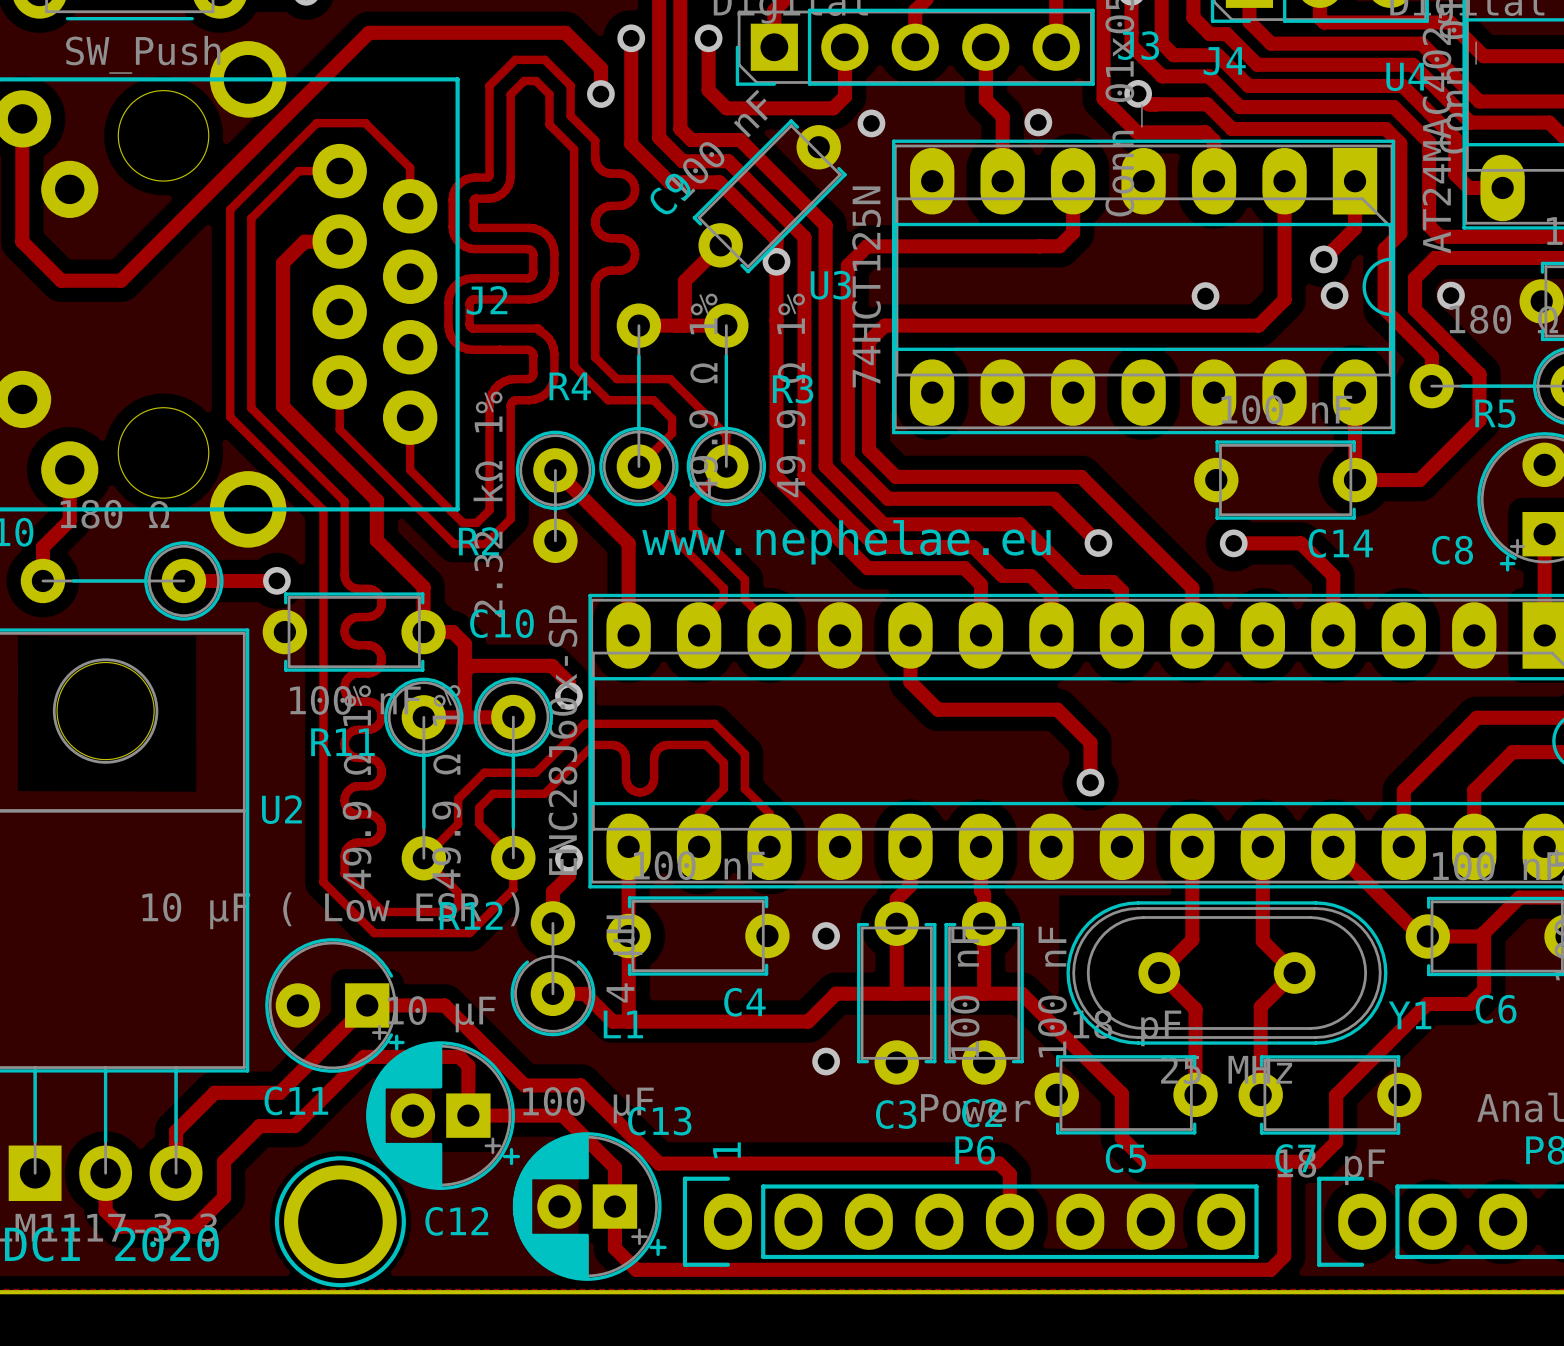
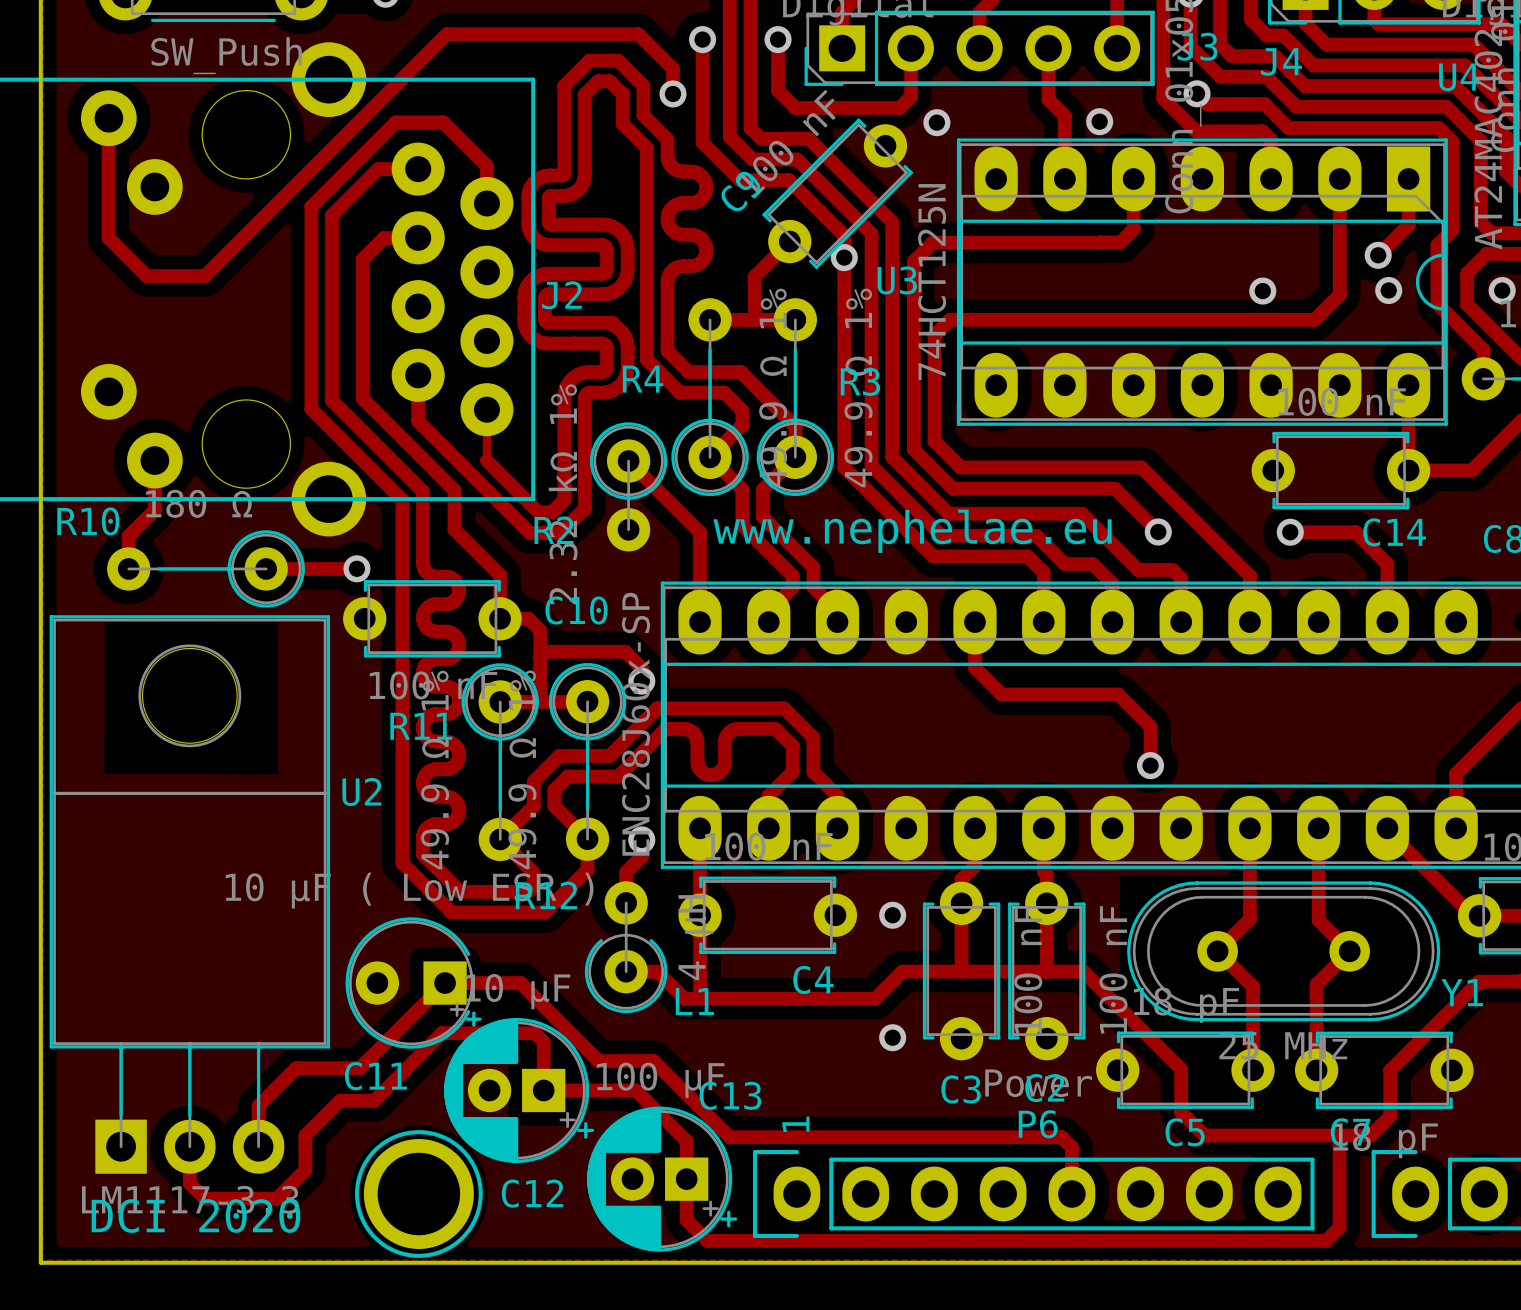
track width: thin (339, 171) (298, 171) (251, 218) (251, 408) (344, 501) (346, 580) (355, 588) (373, 590) (381, 599) (380, 609) (376, 613) (370, 616) (352, 618) (344, 628) (346, 637) (349, 642) (355, 644) (373, 646) (380, 653) (381, 659) (376, 670) (370, 673) (352, 674) (344, 684) (346, 693) (349, 698) (355, 701) (373, 703) (380, 709) (381, 715) (378, 724) (373, 728) (355, 730) (346, 737) (344, 747) (349, 754) (355, 757) (373, 759) (380, 765) (381, 772) (378, 780) (373, 784) (355, 786) (349, 789) (346, 794) (344, 803) (352, 812) (370, 814) (376, 817) (381, 828) (378, 837) (373, 841) (355, 842) (347, 847) (344, 853) (344, 873) (382, 911) (451, 911) (457, 905) (457, 892) (423, 858) (458, 823) (458, 798) (484, 772) (535, 772) (584, 723) (714, 723) (744, 753) (744, 788) (769, 813) (769, 846) -> thick (418, 169) (378, 169) (331, 215) (331, 400) (423, 491) (424, 568) (433, 576) (451, 578) (458, 587) (457, 596) (454, 601) (448, 603) (430, 605) (423, 614) (424, 623) (428, 628) (433, 631) (451, 633) (457, 639) (459, 645) (454, 656) (448, 658) (430, 660) (423, 669) (424, 678) (428, 683) (433, 686) (451, 688) (457, 694) (459, 700) (456, 708) (451, 712) (433, 714) (424, 721) (423, 730) (428, 738) (433, 741) (451, 742) (457, 749) (459, 755) (456, 763) (451, 767) (433, 769) (428, 772) (424, 776) (423, 785) (430, 795) (448, 796) (454, 799) (459, 810) (456, 818) (451, 822) (433, 824) (426, 829) (423, 834) (423, 854) (460, 891) (527, 891) (533, 885) (533, 872) (500, 839) (533, 805) (533, 781) (559, 755) (609, 755) (657, 708) (784, 708) (813, 737) (813, 771) (837, 795) (837, 828)
track width: thin (410, 206) (410, 167) (365, 123) (316, 123) (230, 209) (230, 417) (323, 510) (323, 882) (374, 933) (469, 933) (513, 889) (513, 857) (479, 823) (479, 807) (493, 793) (544, 793) (593, 744) (614, 745) (622, 750) (625, 755) (627, 784) (633, 790) (640, 792) (648, 789) (652, 784) (654, 755) (659, 748) (668, 744) (705, 744) (723, 762) (723, 788) (699, 813) (699, 846) -> thick (486, 203) (486, 165) (443, 122) (395, 122) (311, 206) (311, 409) (402, 500) (402, 862) (451, 912) (544, 912) (587, 869) (587, 839) (554, 805) (554, 790) (567, 776) (618, 776) (665, 728) (686, 729) (694, 734) (697, 739) (698, 767) (705, 773) (711, 775) (719, 772) (723, 767) (725, 739) (730, 731) (738, 728) (775, 728) (792, 746) (792, 771) (768, 795) (768, 828)
track width: thin (539, 331) (538, 328) (473, 328) (469, 324) (469, 304) (472, 299) (534, 298) (544, 293) (553, 279) (553, 247) (544, 233) (528, 227) (476, 227) (473, 225) (474, 199) (498, 196) (505, 190) (510, 181) (510, 94) (524, 81) (536, 81) (549, 94) (549, 124) (574, 149) (574, 366) (608, 400) (653, 400) (672, 418) (672, 433) (638, 466) (672, 499) (672, 536) (723, 588) (723, 599) (699, 624) (699, 635) -> thick (613, 325) (612, 322) (548, 322) (544, 318) (544, 298) (547, 294) (608, 293) (618, 288) (627, 274) (627, 244) (618, 230) (602, 224) (551, 224) (549, 222) (549, 196) (572, 193) (580, 187) (584, 179) (584, 94) (598, 81) (609, 81) (622, 94) (622, 123) (646, 147) (646, 359) (680, 392) (724, 392) (742, 410) (742, 424) (710, 457) (742, 489) (742, 525) (792, 576) (792, 587) (768, 611) (768, 622)
track width: thin (539, 331) (548, 338) (553, 348) (553, 380) (548, 390) (539, 397) (515, 400) (511, 403) (510, 518) (485, 544) (454, 544) (339, 429) (339, 382) -> thick (613, 325) (622, 332) (627, 342) (627, 373) (622, 383) (613, 390) (589, 392) (585, 395) (584, 508) (560, 532) (529, 532) (418, 421) (418, 375)
track width: thin (410, 469) (463, 522) (476, 522) (489, 510) (490, 399) (495, 388) (504, 381) (528, 378) (532, 376) (533, 354) (528, 350) (472, 349) (457, 344) (449, 330) (449, 297) (457, 283) (467, 278) (529, 277) (533, 273) (533, 253) (528, 249) (474, 249) (461, 244) (453, 231) (453, 194) (457, 185) (465, 179) (487, 177) (489, 175) (489, 85) (515, 59) (544, 59) (570, 85) (570, 115) (595, 140) (595, 160) (598, 167) (607, 173) (625, 175) (631, 179) (634, 186) (633, 196) (629, 202) (622, 205) (604, 207) (598, 212) (595, 218) (596, 229) (601, 234) (607, 237) (625, 239) (633, 247) (635, 254) (633, 261) (629, 267) (622, 270) (604, 272) (596, 279) (595, 357) (616, 379) (670, 379) (726, 435) (726, 466) (693, 499) (693, 527) (744, 579) (744, 599) (769, 624) (769, 635) -> thick (486, 460) (538, 512) (551, 512) (564, 499) (564, 391) (569, 381) (578, 374) (605, 369) (606, 348) (602, 343) (548, 343) (533, 338) (524, 325) (524, 292) (533, 278) (542, 274) (603, 273) (606, 269) (606, 249) (602, 245) (550, 245) (536, 240) (528, 228) (528, 192) (533, 183) (540, 177) (562, 175) (564, 173) (564, 85) (589, 60) (618, 60) (643, 85) (643, 115) (667, 139) (667, 159) (670, 165) (679, 171) (697, 173) (702, 177) (705, 183) (704, 194) (700, 199) (694, 202) (676, 204) (670, 209) (667, 215) (669, 225) (673, 231) (679, 234) (697, 236) (704, 243) (706, 250) (704, 257) (700, 262) (694, 265) (676, 267) (669, 275) (667, 350) (688, 372) (740, 372) (795, 426) (795, 457) (762, 489) (762, 517) (813, 567) (813, 587) (837, 611) (837, 622)

